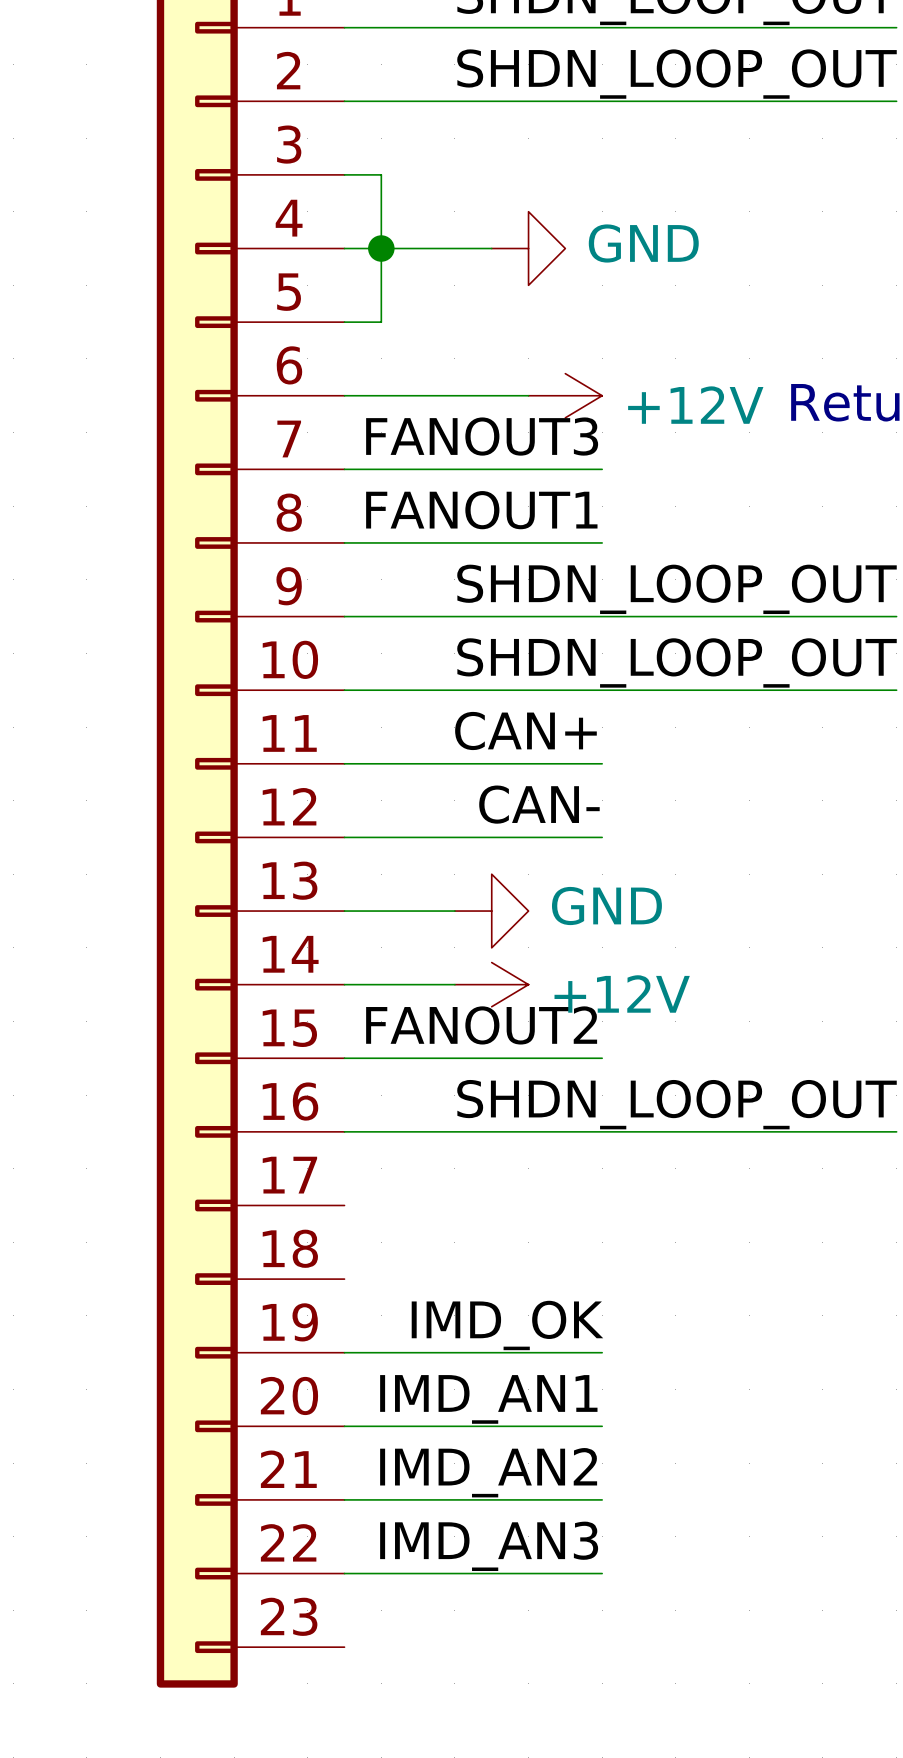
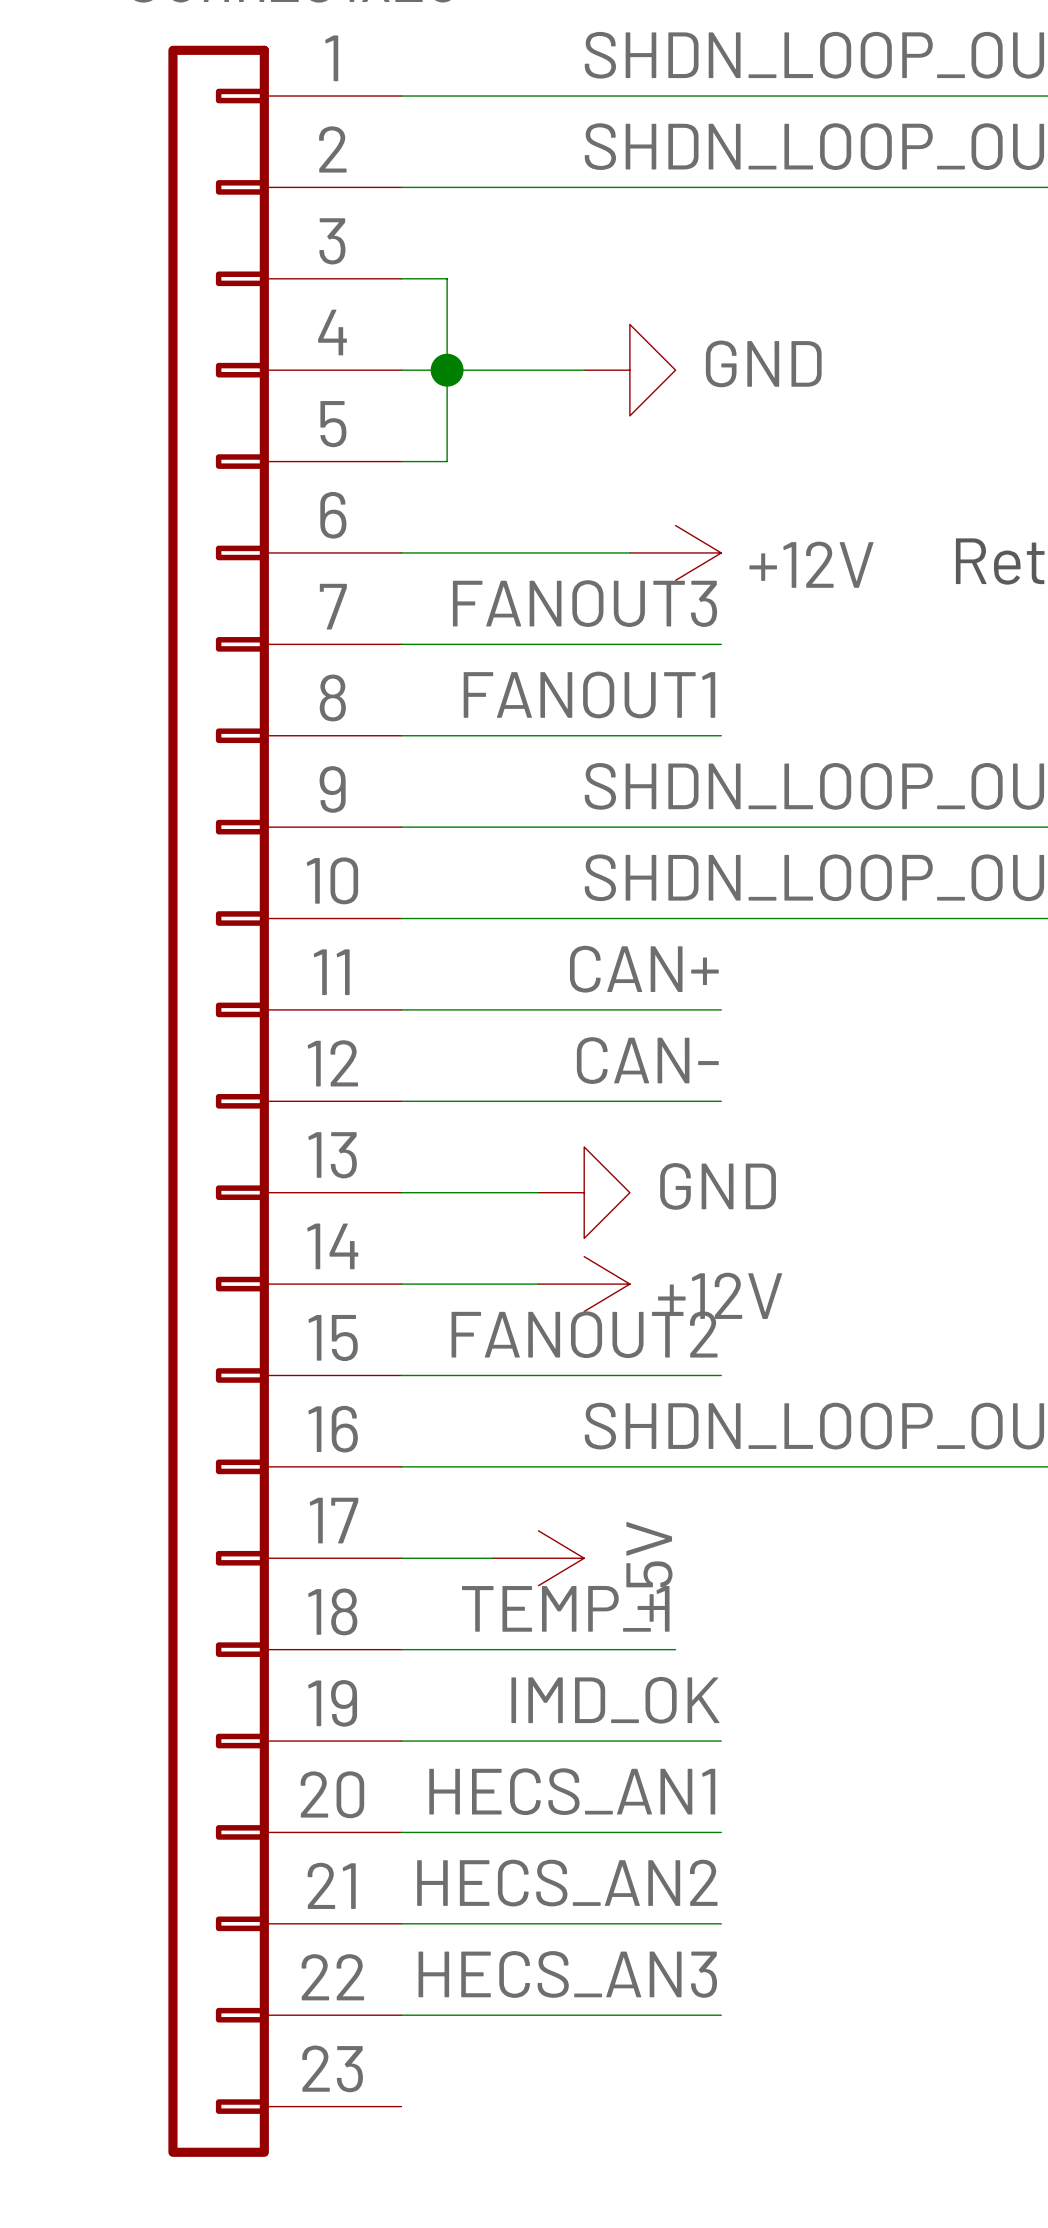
wire: none -> (401, 1558) (492, 1558)
power symbol: none -> +5V (538, 1558)
label: none -> TEMP_1 (565, 1608)
wire: none -> (401, 1649) (675, 1649)
label: IMD_AN1 (488, 1399) -> HECS_AN1 (572, 1791)
label: IMD_AN2 (488, 1472) -> HECS_AN2 (567, 1883)
label: IMD_AN3 (489, 1546) -> HECS_AN3 (567, 1974)

